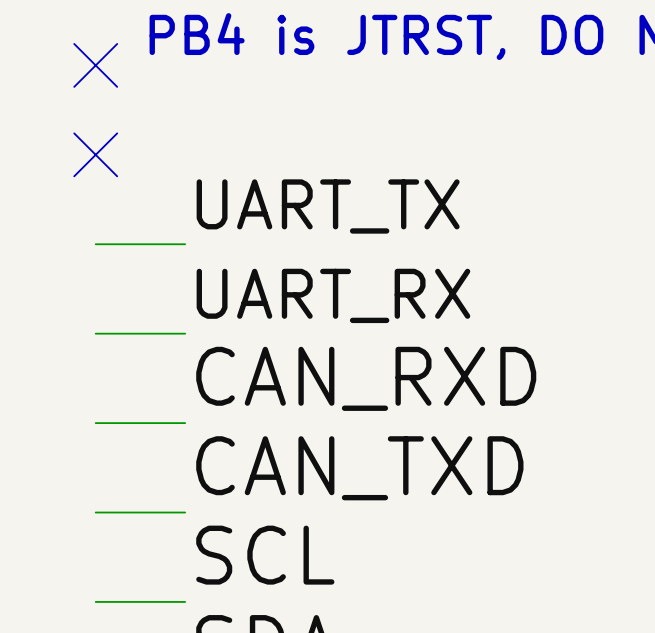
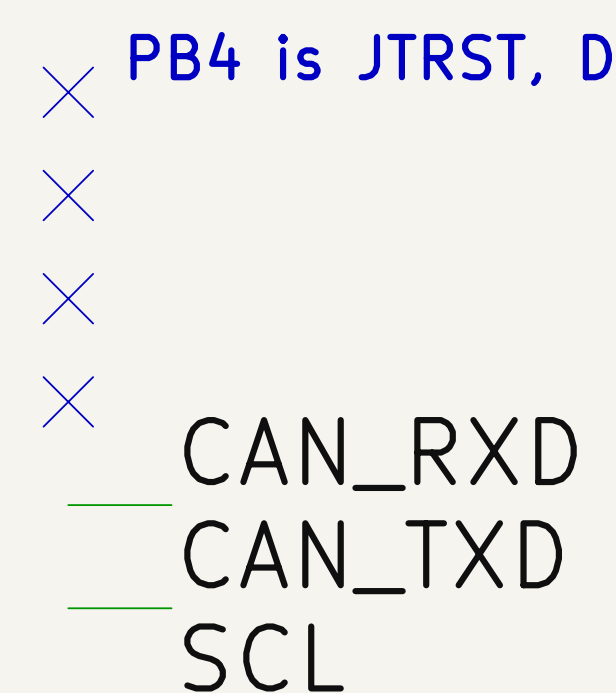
label: UART_TX (328, 206) -> none
wire: (95, 244) (185, 244) -> none
no-connect mark: none -> (68, 298)
label: UART_RX (333, 295) -> none
wire: (95, 333) (185, 333) -> none
no-connect mark: none -> (68, 401)

